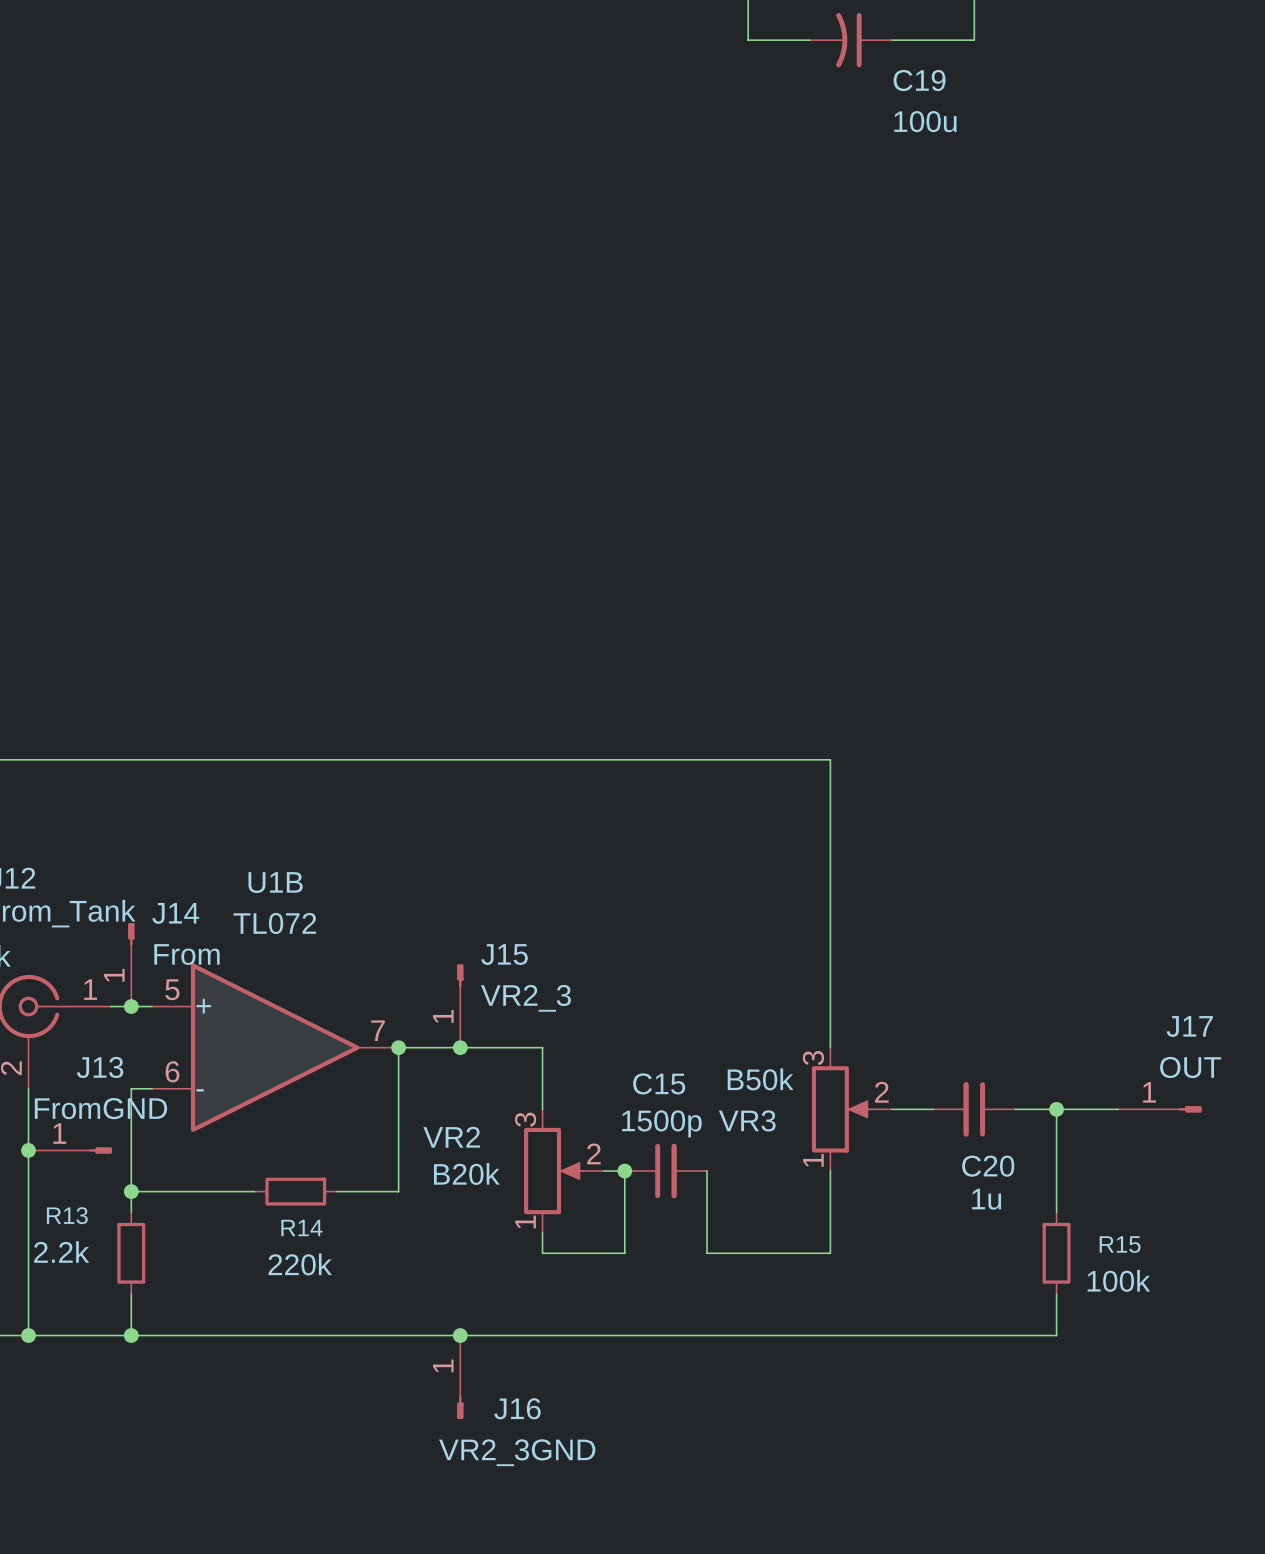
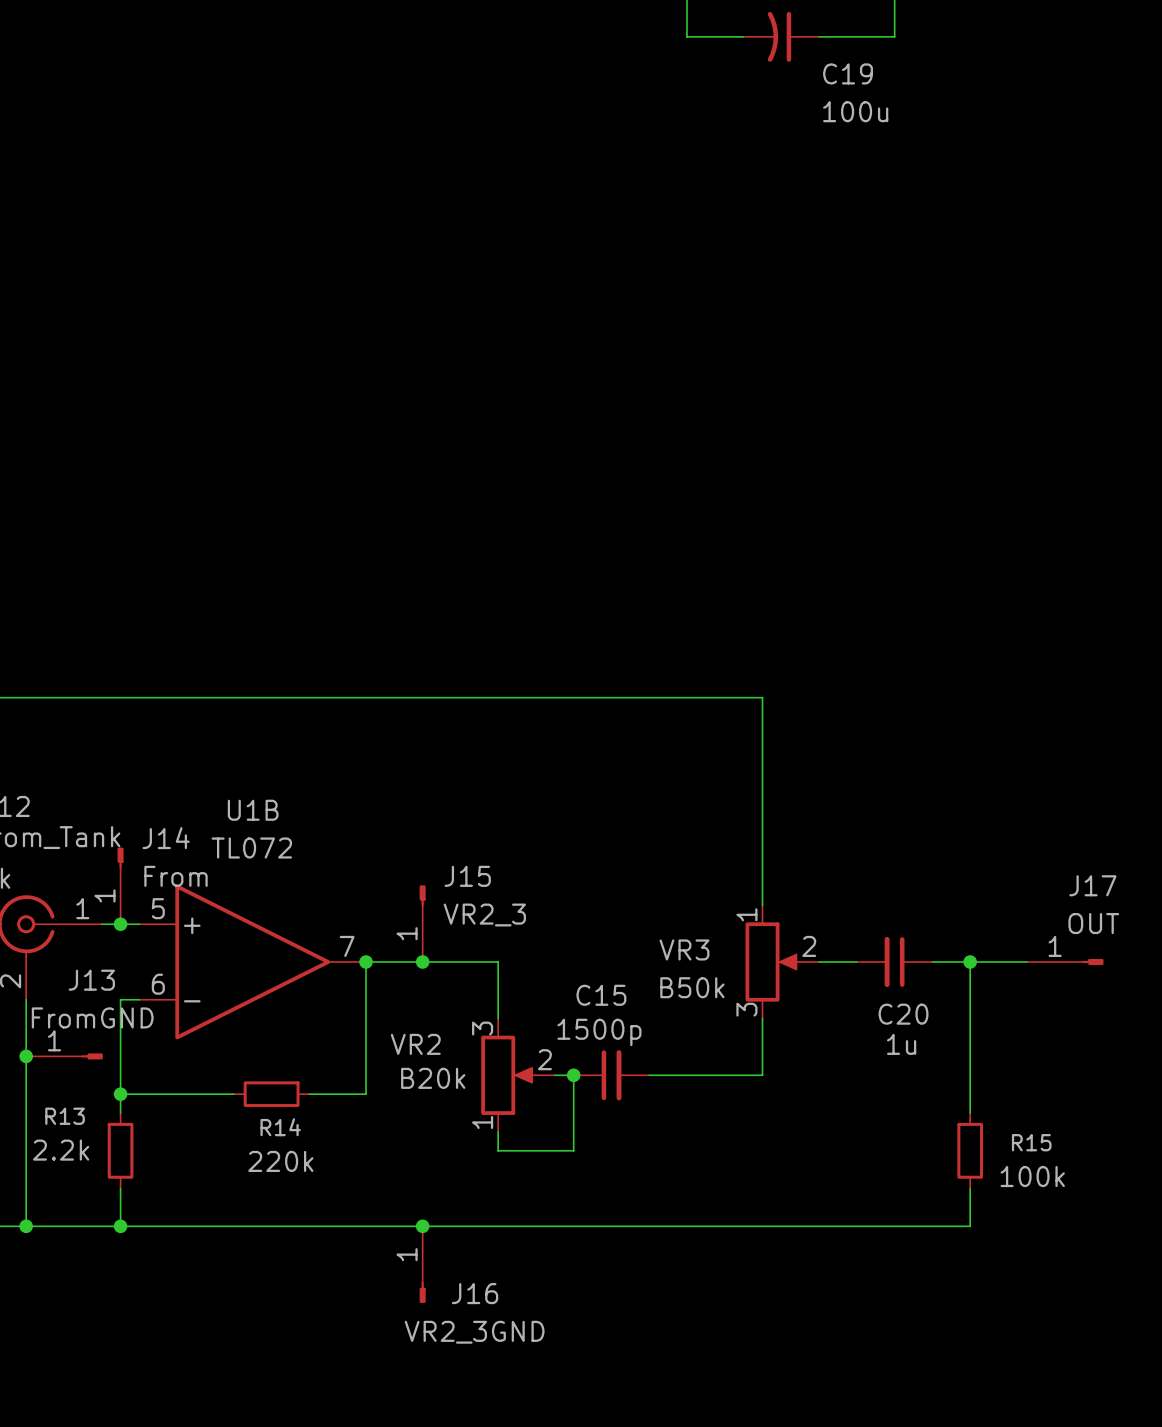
wire: (830, 985) (830, 1047) -> (970, 962) (970, 1018)
VR3 flip: as is (841, 1109) -> up-down (772, 962)
wire: (892, 1109) (933, 1109) -> (819, 962) (856, 962)
C20 position: (974, 1109) -> (894, 962)
wire: (1015, 1109) (1118, 1109) -> (932, 962) (1026, 962)
junction position: (1056, 1109) -> (970, 962)
J17 position: (1160, 1109) -> (1065, 962)
wire: (707, 1171) (707, 1253) (830, 1253) (830, 1171) -> (649, 1075) (762, 1075) (762, 1018)

